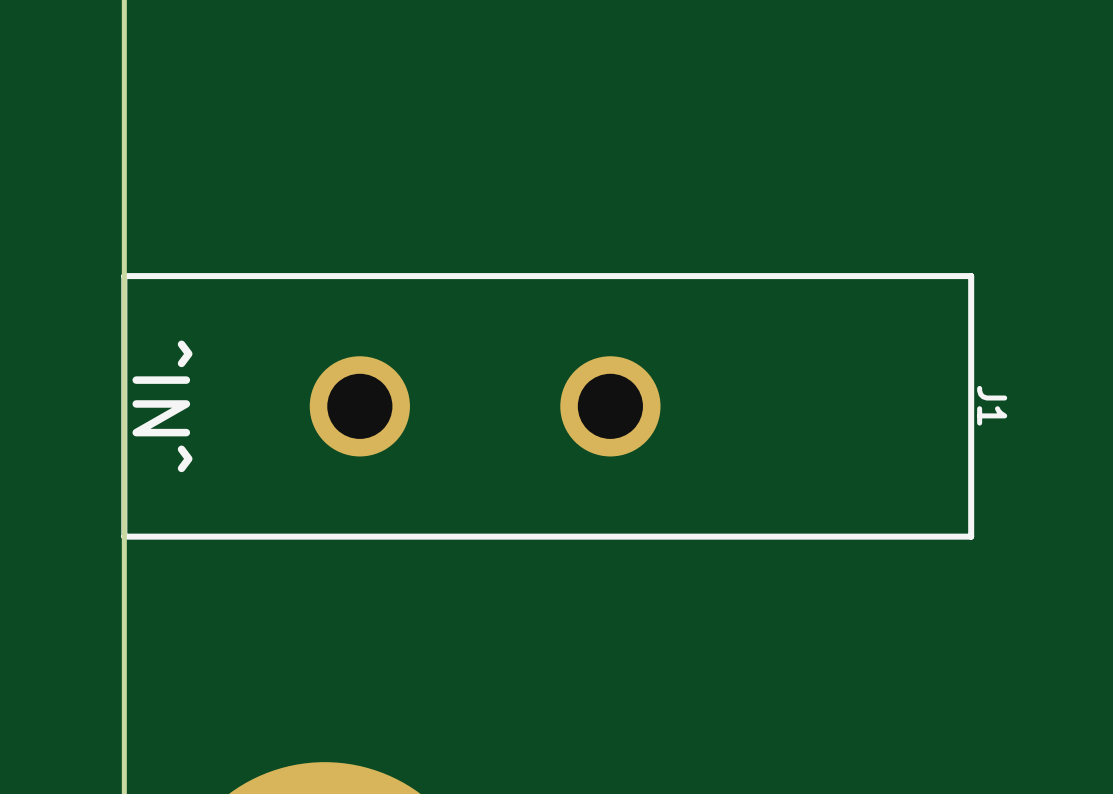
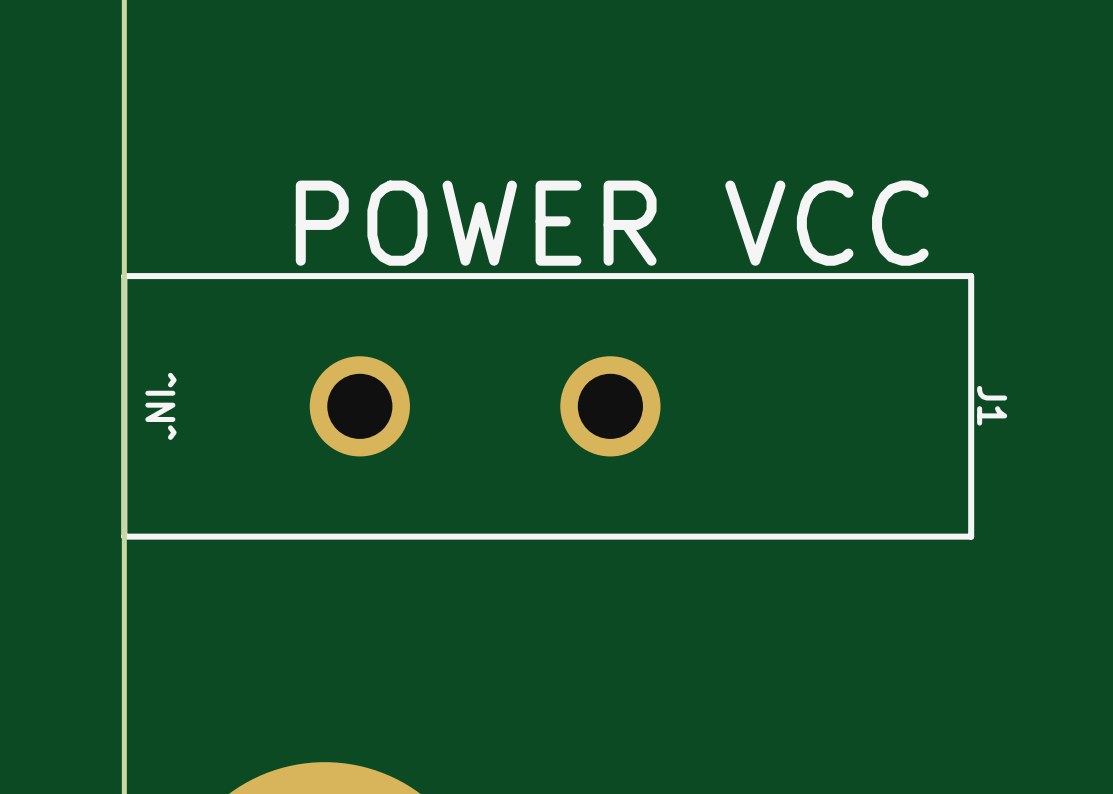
text: none -> POWER VCC (612, 223)
J1 footprint: [121, 273, 975, 540] -> [121, 273, 975, 540]

